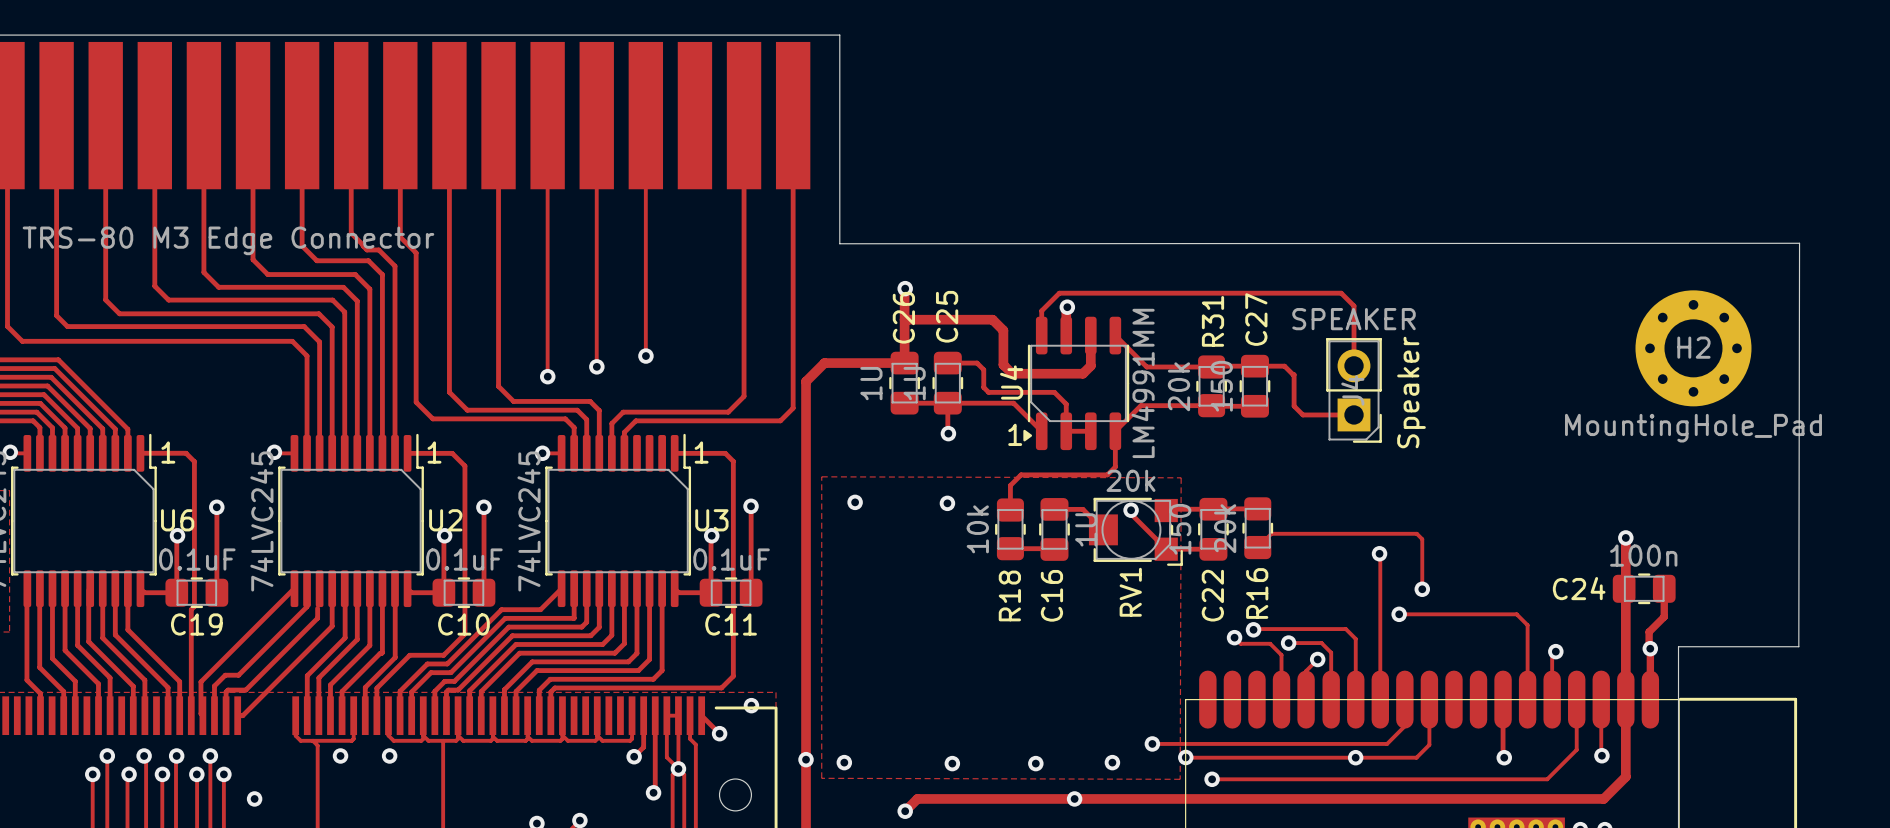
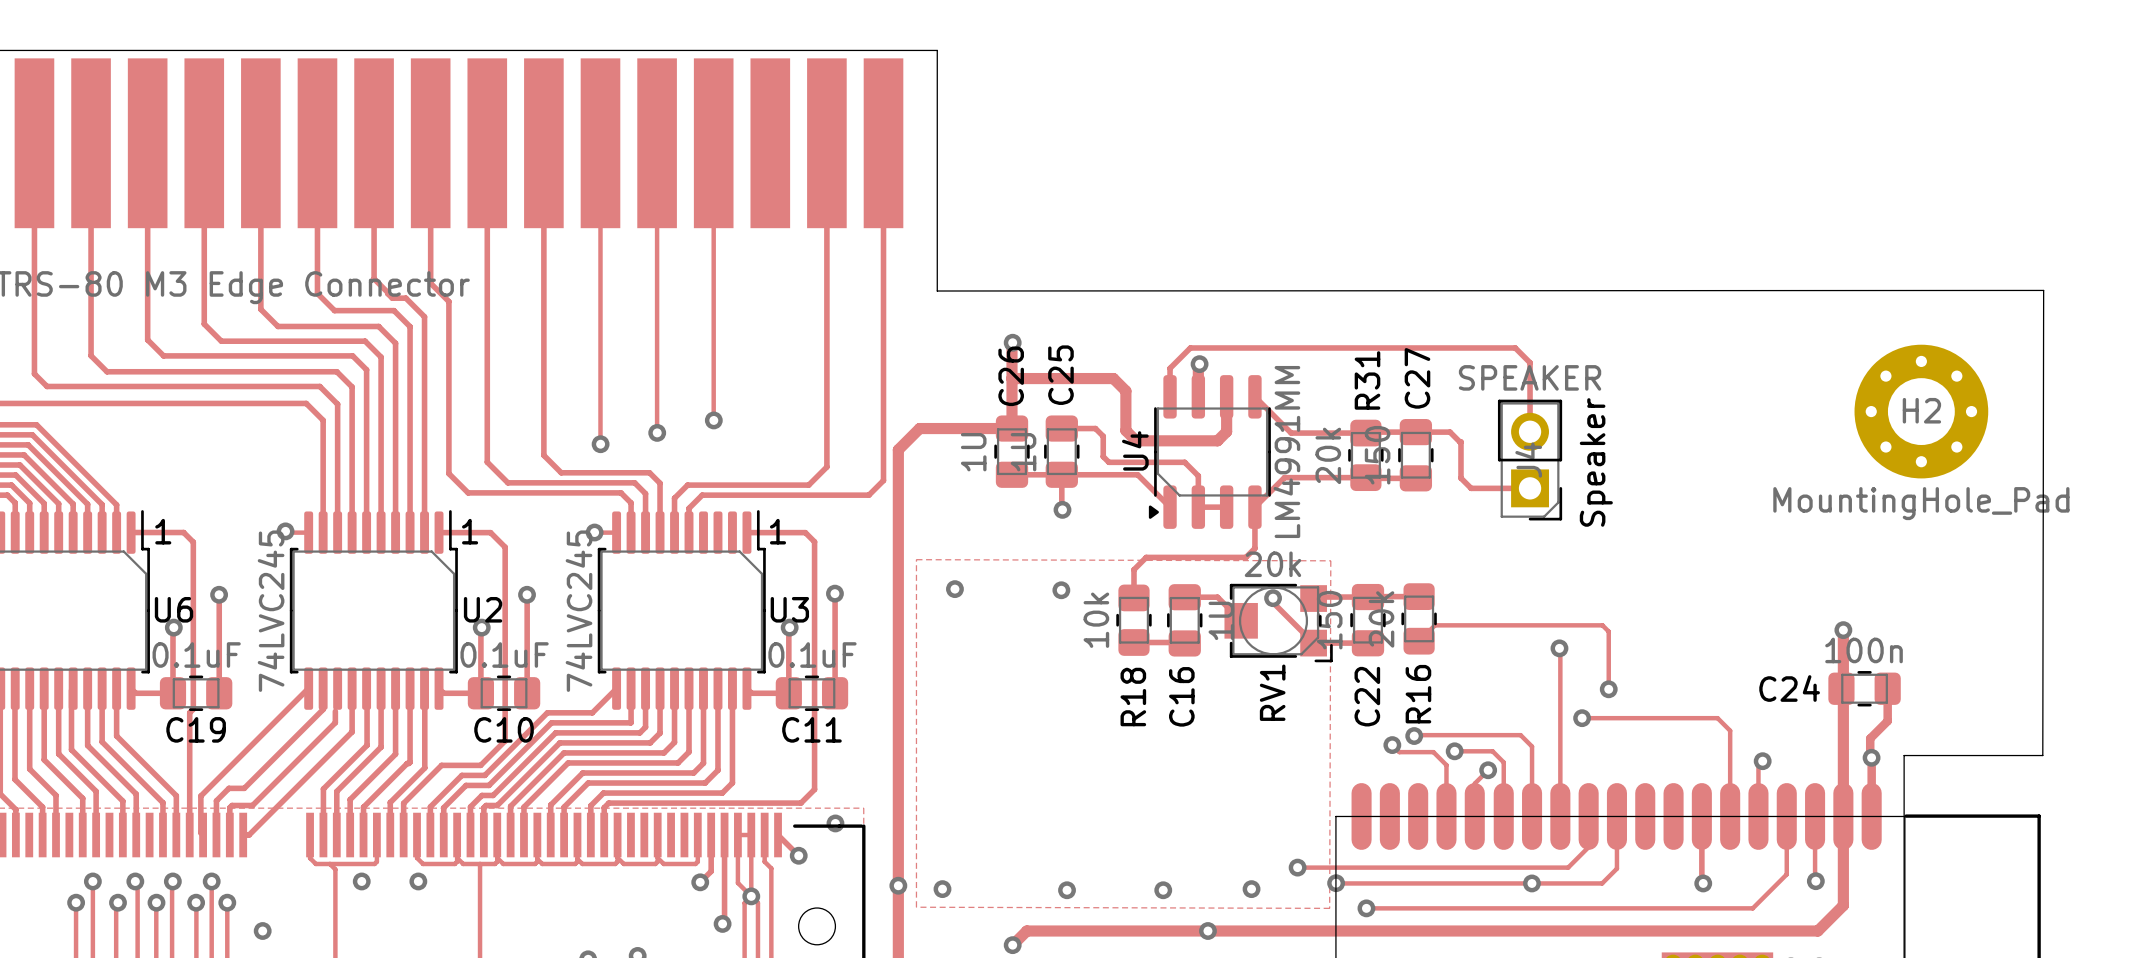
text: 1 (1015, 434) -> none

